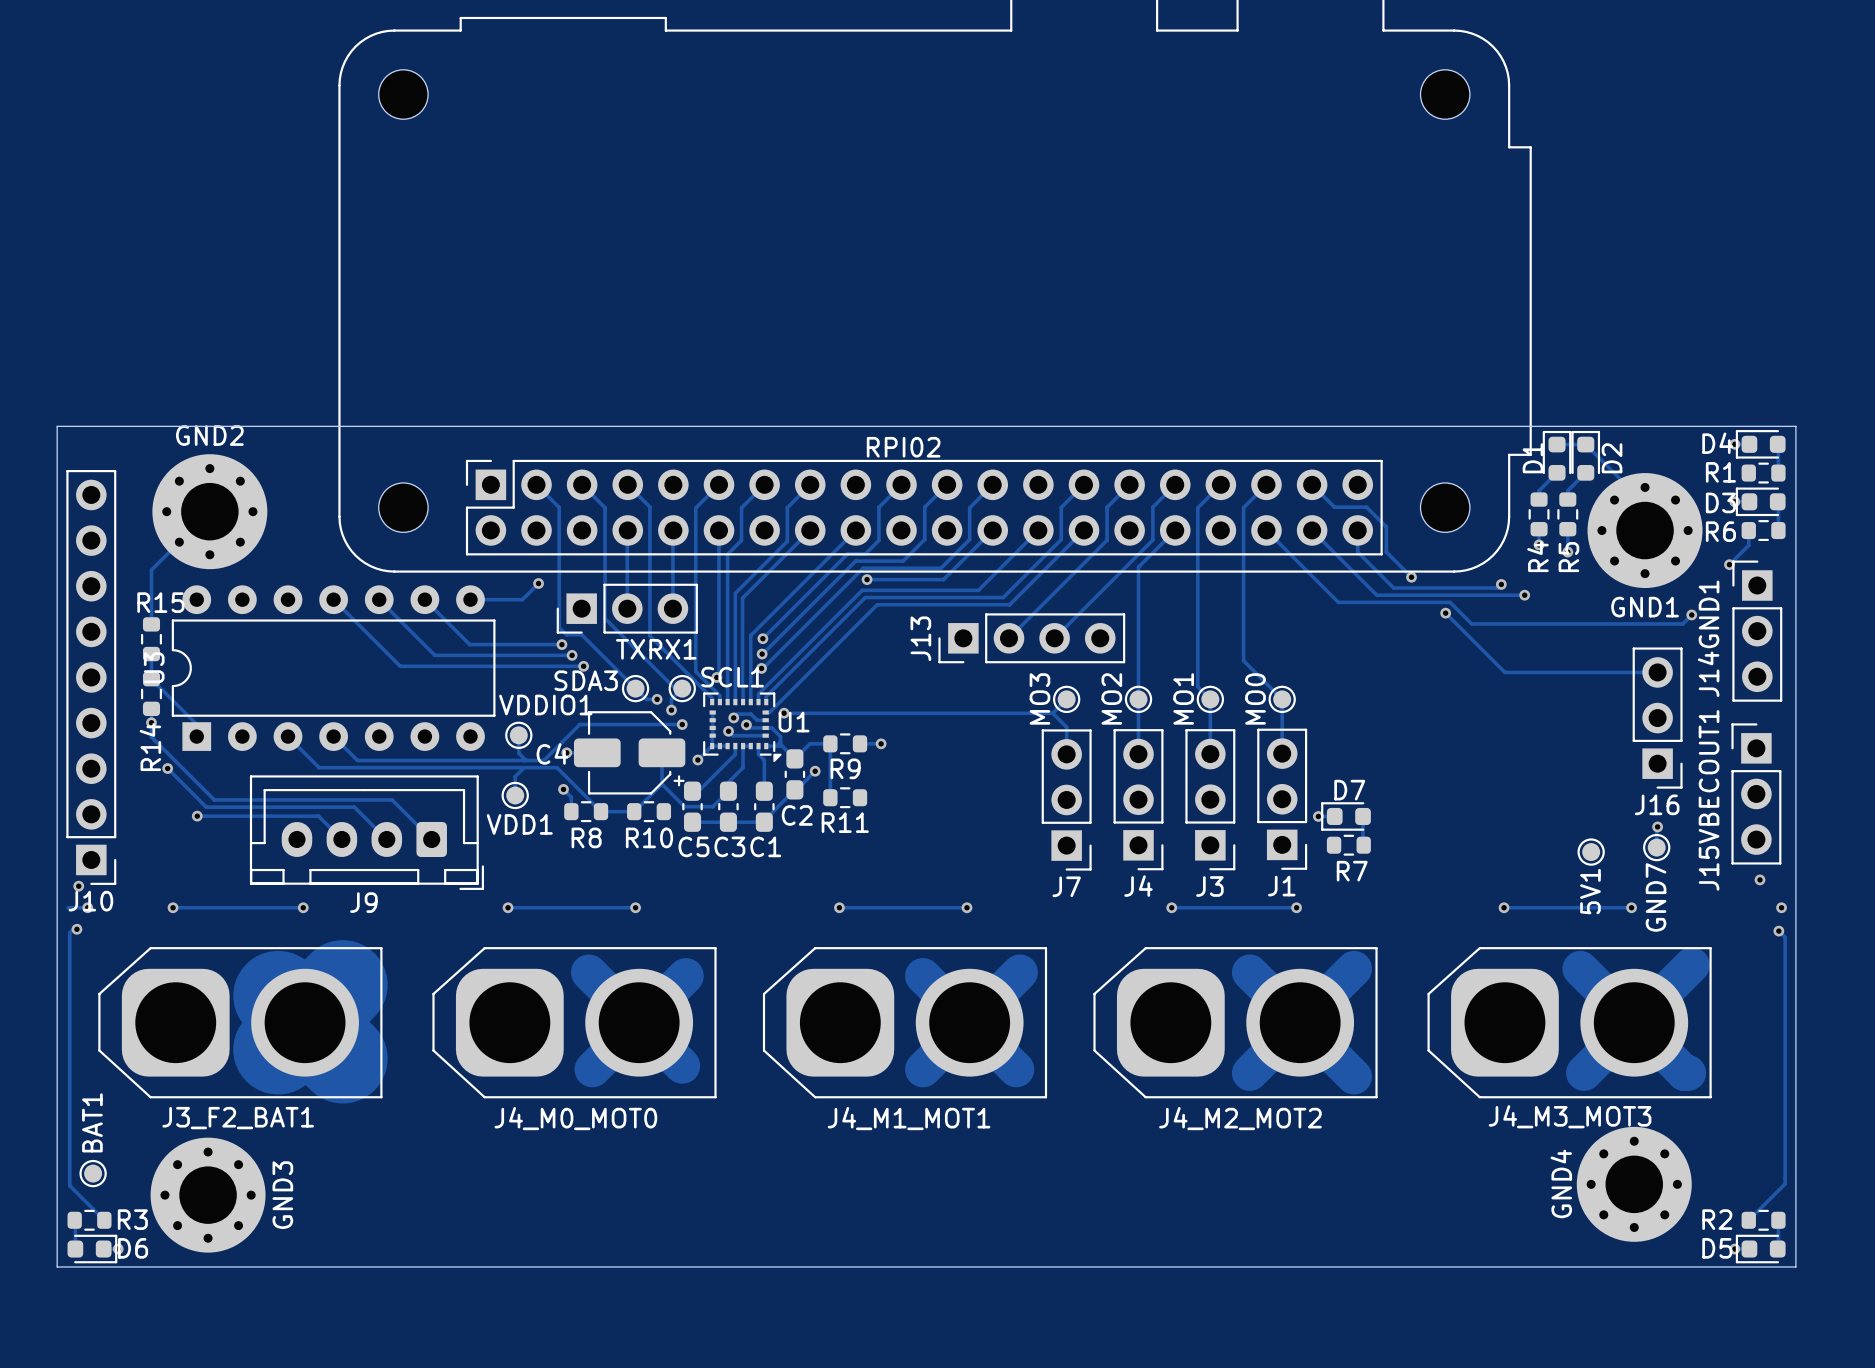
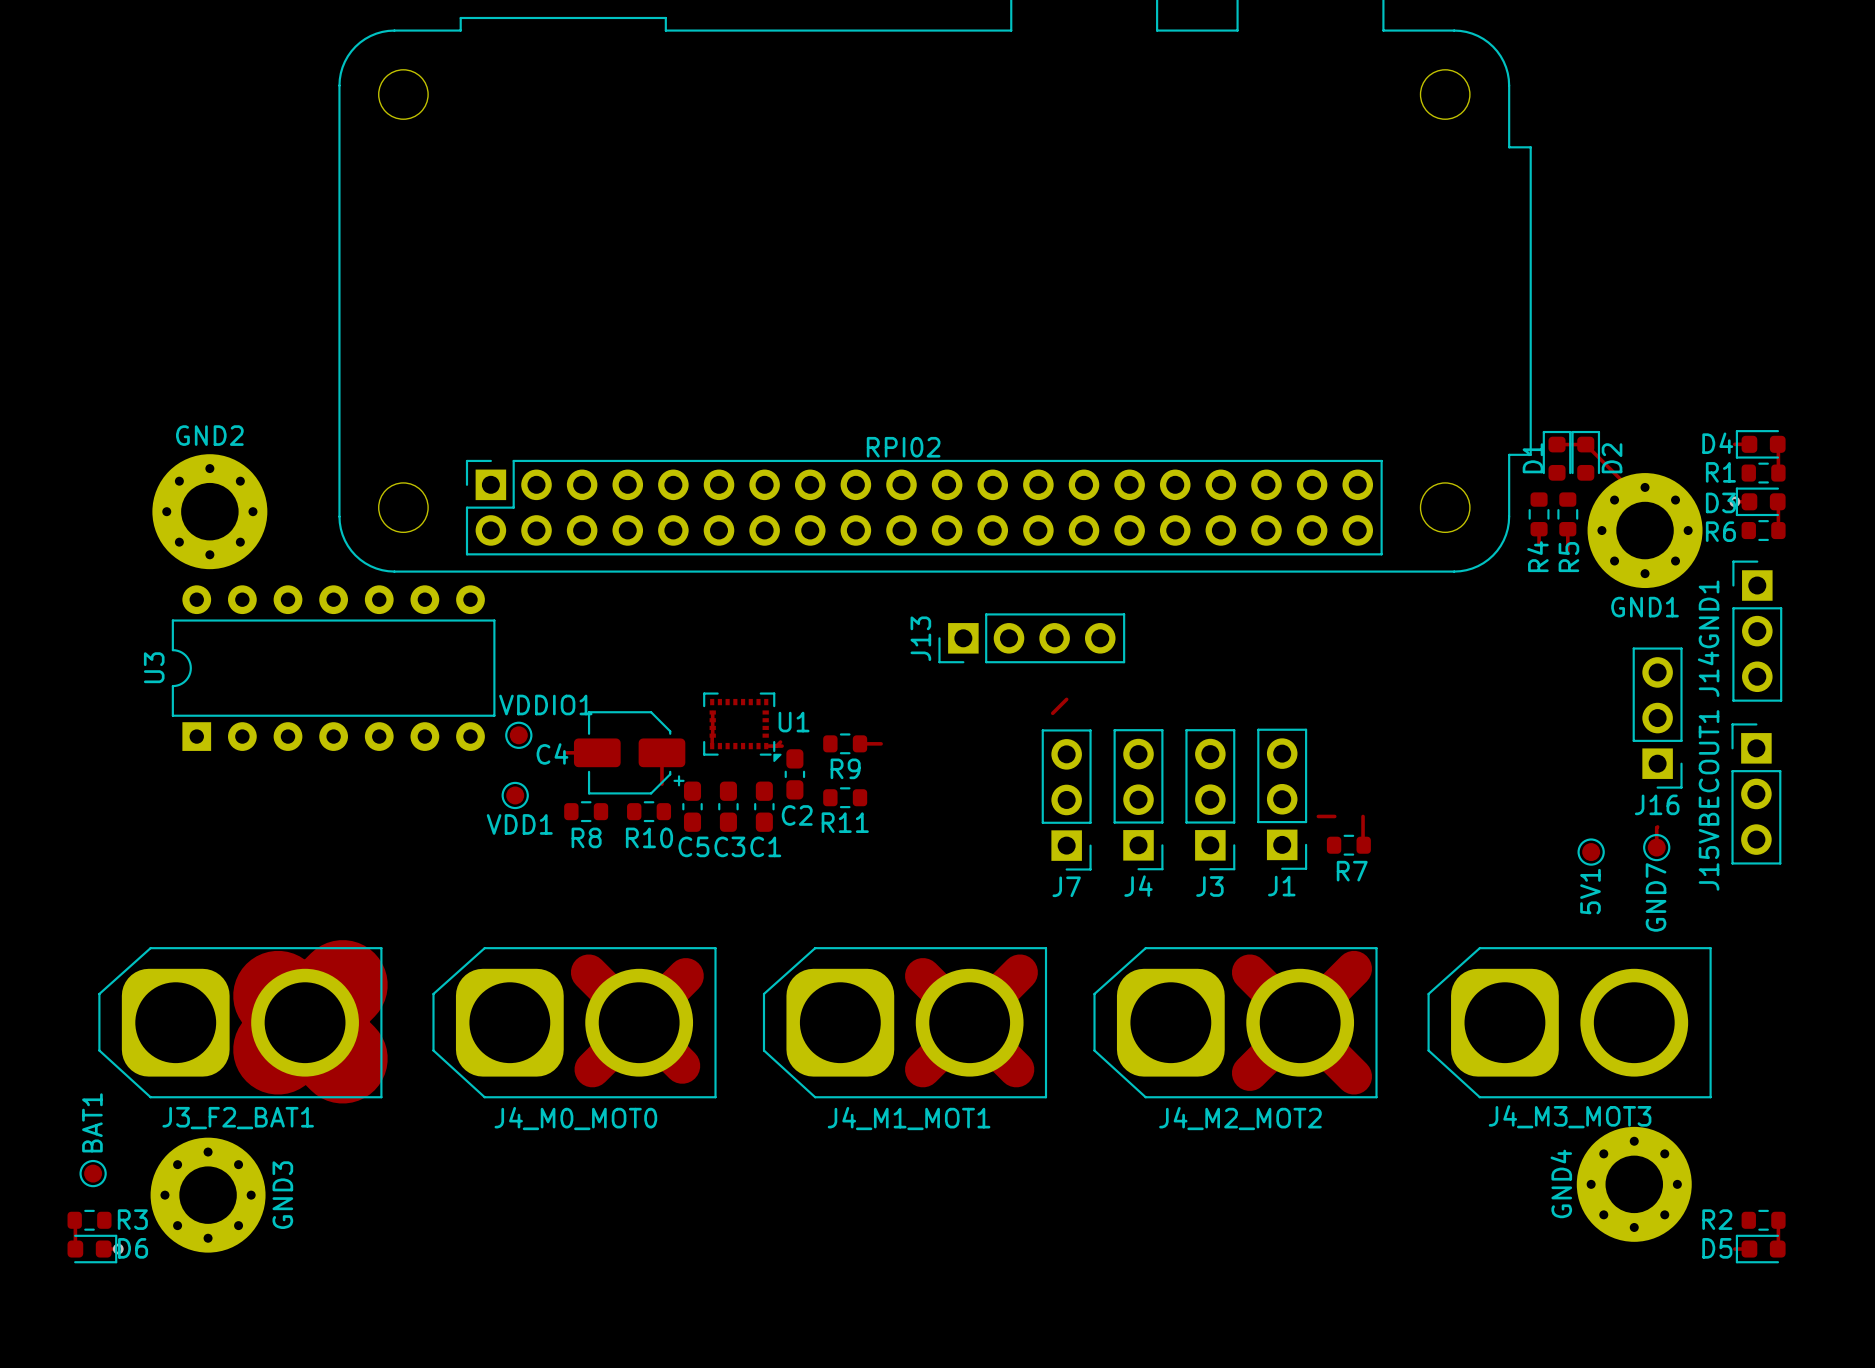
board edge: (57, 426) (1795, 426) (1795, 1266) (57, 1266) (57, 426) -> none
via: (1734, 444) -> none
track: (1557, 472) (1539, 490) (1539, 499) -> none
track: (1585, 472) (1567, 490) (1567, 499) -> none
track: (536, 484) (559, 507) (559, 627) (566, 634) (581, 634) (646, 699) (657, 699) -> none
track: (582, 484) (605, 507) (605, 618) (675, 688) (682, 688) (671, 699) (671, 710) -> none
track: (627, 484) (649, 507) (649, 635) (712, 698) (712, 702) -> none
track: (719, 484) (695, 508) (695, 671) (719, 695) (719, 702) -> none
track: (764, 484) (741, 507) (741, 540) (727, 554) (727, 702) -> none
track: (810, 484) (787, 507) (787, 541) (735, 593) (735, 702) -> none
track: (901, 484) (878, 507) (878, 540) (865, 553) (847, 553) (762, 638) -> none
track: (947, 484) (924, 507) (924, 539) (903, 561) (855, 561) (762, 654) -> none
track: (992, 484) (969, 507) (969, 539) (940, 568) (863, 568) (761, 668) -> none
track: (1083, 484) (1061, 507) (1061, 539) (1003, 597) (865, 597) (766, 696) (766, 702) -> none
track: (1129, 484) (1107, 507) (1107, 540) -> none
track: (1175, 484) (1152, 507) (1152, 540) (1054, 638) -> none
track: (1220, 484) (1197, 507) (1197, 686) (1210, 699) (1210, 754) -> none
track: (1266, 484) (1243, 507) (1243, 660) (1282, 699) (1282, 753) -> none
track: (1312, 484) (1334, 507) (1366, 507) (1386, 526) (1386, 552) (1411, 577) -> none
track: (209, 511) (151, 570) (151, 624) -> none
track: (627, 530) (627, 608) -> none
track: (673, 530) (672, 608) -> none
track: (719, 530) (719, 675) (716, 677) -> none
track: (810, 530) (742, 598) (743, 702) -> none
track: (855, 530) (750, 635) (750, 702) -> none
track: (992, 530) (943, 579) (867, 579) -> none
track: (1038, 530) (978, 590) (862, 590) (758, 694) (758, 702) -> none
track: (1083, 530) (1009, 604) (877, 604) (769, 712) (765, 712) -> none
track: (1175, 530) (1138, 567) (1138, 754) -> none
track: (1266, 530) (1338, 602) (1450, 602) (1471, 623) (1682, 623) (1691, 614) -> none
track: (1312, 530) (1376, 595) (1524, 595) -> none
track: (1357, 530) (1357, 552) (1393, 588) (1497, 588) (1501, 584) -> none
track: (1748, 530) (1748, 545) (1729, 564) -> none
track: (1106, 540) (1009, 638) -> none
via: (1539, 544) -> none
via: (1567, 552) -> none
via: (1729, 564) -> none
via: (1411, 577) -> none
via: (867, 579) -> none
track: (538, 583) (522, 599) (470, 599) -> none
via: (538, 583) -> none
via: (1501, 584) -> none
via: (1524, 595) -> none
track: (333, 599) (400, 666) (583, 666) -> none
track: (379, 599) (434, 655) (572, 655) -> none
track: (424, 599) (469, 644) (561, 644) -> none
TXRX1: (627, 608) -> none
track: (1445, 613) (1504, 672) (1657, 672) -> none
via: (1445, 613) -> none
via: (1691, 614) -> none
via: (762, 638) -> none
R15: (151, 639) -> none
via: (561, 644) -> none
track: (151, 654) (151, 679) (196, 724) (196, 736) -> none
via: (762, 654) -> none
via: (572, 655) -> none
via: (583, 666) -> none
via: (761, 668) -> none
J10: (91, 677) -> none
via: (716, 677) -> none
SDA3: (635, 688) -> none
SCL1: (682, 688) -> none
R14: (151, 693) -> none
via: (657, 699) -> none
MO3: (1066, 699) -> none
MO2: (1138, 699) -> none
MO1: (1210, 699) -> none
MO0: (1282, 699) -> none
track: (151, 708) (151, 737) (214, 799) (392, 799) (431, 839) -> none
via: (671, 710) -> none
track: (784, 713) (1052, 713) (1066, 727) (1066, 754) -> none
via: (784, 713) -> none
track: (733, 717) (737, 714) (750, 714) (757, 720) (765, 720) -> none
via: (733, 717) -> none
via: (151, 722) -> none
track: (682, 724) (579, 724) (543, 760) (357, 760) (333, 736) -> none
via: (682, 724) -> none
track: (746, 724) (749, 727) (771, 727) (780, 736) (780, 744) (794, 758) (809, 743) (830, 743) (830, 797) -> none
via: (746, 724) -> none
track: (728, 731) (732, 735) (765, 735) -> none
via: (728, 731) -> none
track: (518, 735) (518, 753) (526, 760) -> none
track: (288, 736) (319, 767) (556, 767) (600, 811) (634, 811) (661, 784) (684, 806) (712, 806) (728, 791) -> none
via: (881, 743) -> none
track: (727, 746) (711, 746) (697, 760) -> none
track: (735, 746) (735, 754) (701, 788) (692, 788) -> none
track: (750, 746) (743, 746) (743, 767) (728, 782) -> none
track: (758, 746) (758, 754) (764, 760) (764, 791) -> none
via: (566, 752) -> none
via: (697, 760) -> none
track: (524, 767) (515, 776) (515, 795) -> none
track: (167, 768) (206, 807) (354, 807) (386, 839) -> none
via: (167, 768) -> none
track: (815, 771) (764, 822) (692, 822) -> none
via: (815, 771) -> none
track: (563, 789) (571, 797) (571, 811) -> none
via: (563, 789) -> none
track: (197, 816) (318, 816) (341, 839) -> none
via: (197, 816) -> none
via: (1318, 816) -> none
D7: (1346, 816) -> none
via: (1657, 826) -> none
J9: (366, 832) -> none
via: (1759, 879) -> none
via: (78, 886) -> none
track: (67, 907) (87, 907) -> none
via: (87, 907) -> none
track: (173, 907) (303, 907) -> none
via: (173, 907) -> none
via: (303, 907) -> none
track: (508, 907) (635, 907) -> none
via: (508, 907) -> none
via: (635, 907) -> none
track: (839, 907) (966, 907) -> none
via: (839, 907) -> none
via: (966, 907) -> none
track: (1171, 907) (1296, 907) -> none
via: (1171, 907) -> none
via: (1296, 907) -> none
track: (1504, 907) (1631, 907) -> none
via: (1504, 907) -> none
via: (1631, 907) -> none
via: (1781, 907) -> none
track: (76, 929) (78, 925) (69, 932) (69, 1185) (104, 1220) -> none
via: (76, 929) -> none
track: (1778, 931) (1785, 937) (1785, 1183) (1749, 1220) -> none
via: (1778, 931) -> none
track: (1691, 965) (1583, 1072) -> none
track: (1580, 968) (1684, 1072) (1688, 1072) -> none
via: (1734, 1249) -> none

